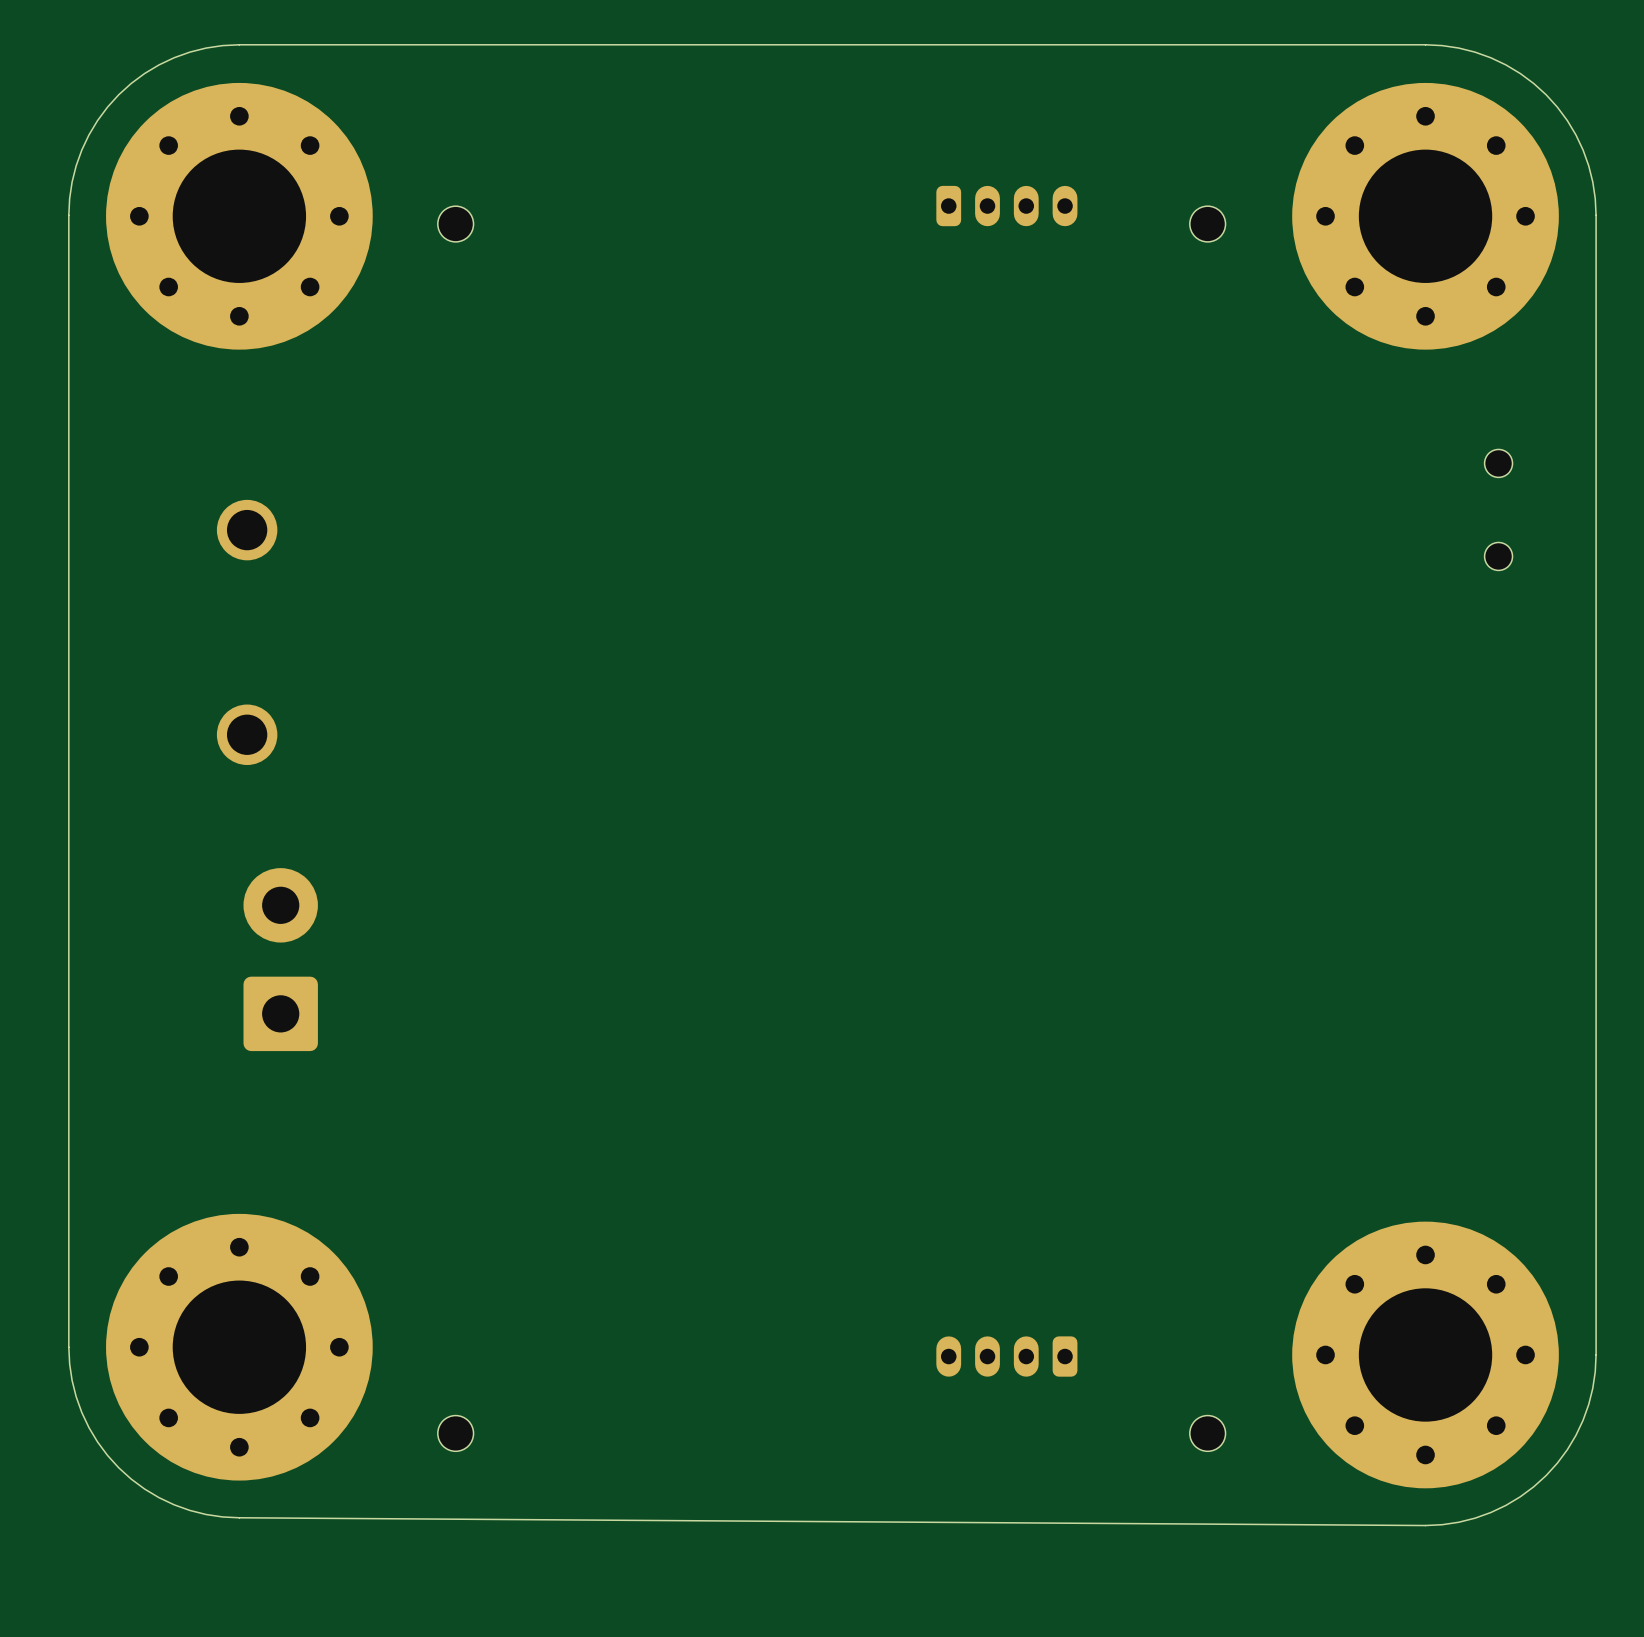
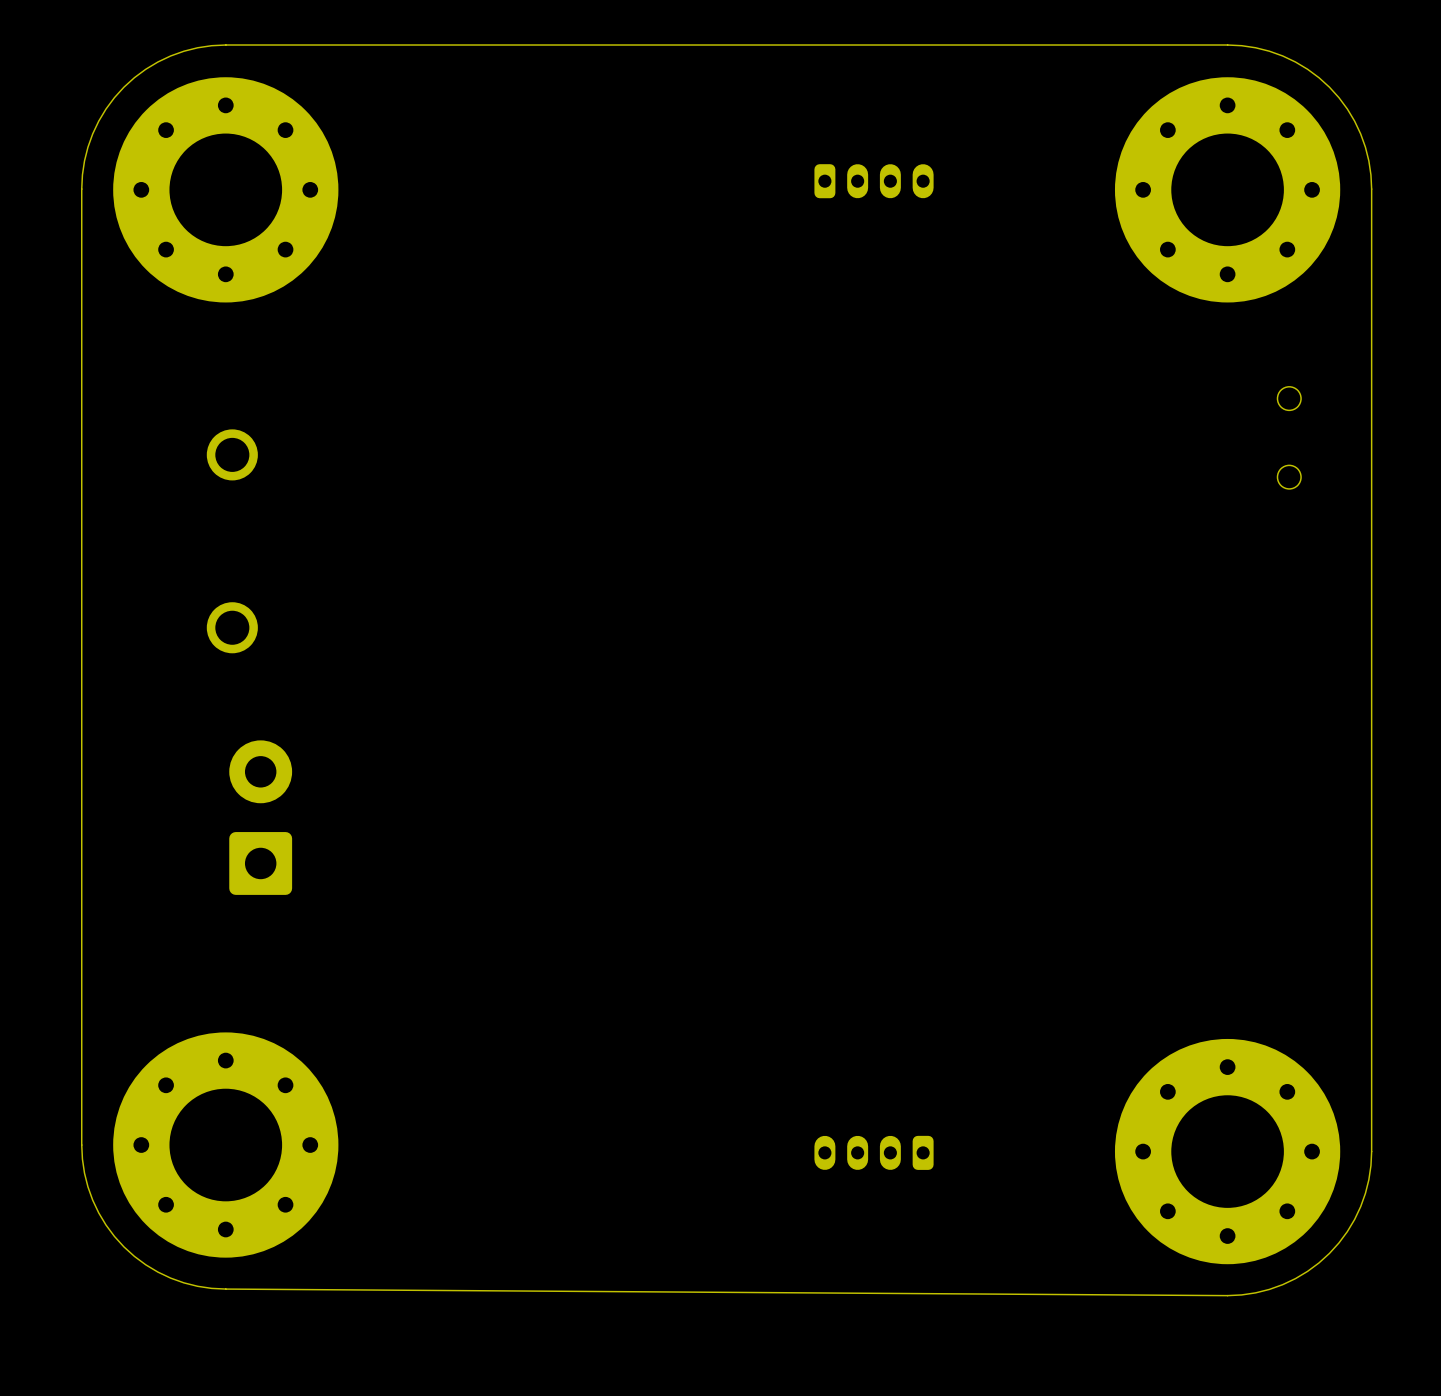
part: (455, 224) -> none
part: (1207, 224) -> none
part: (455, 1433) -> none
part: (1207, 1433) -> none

